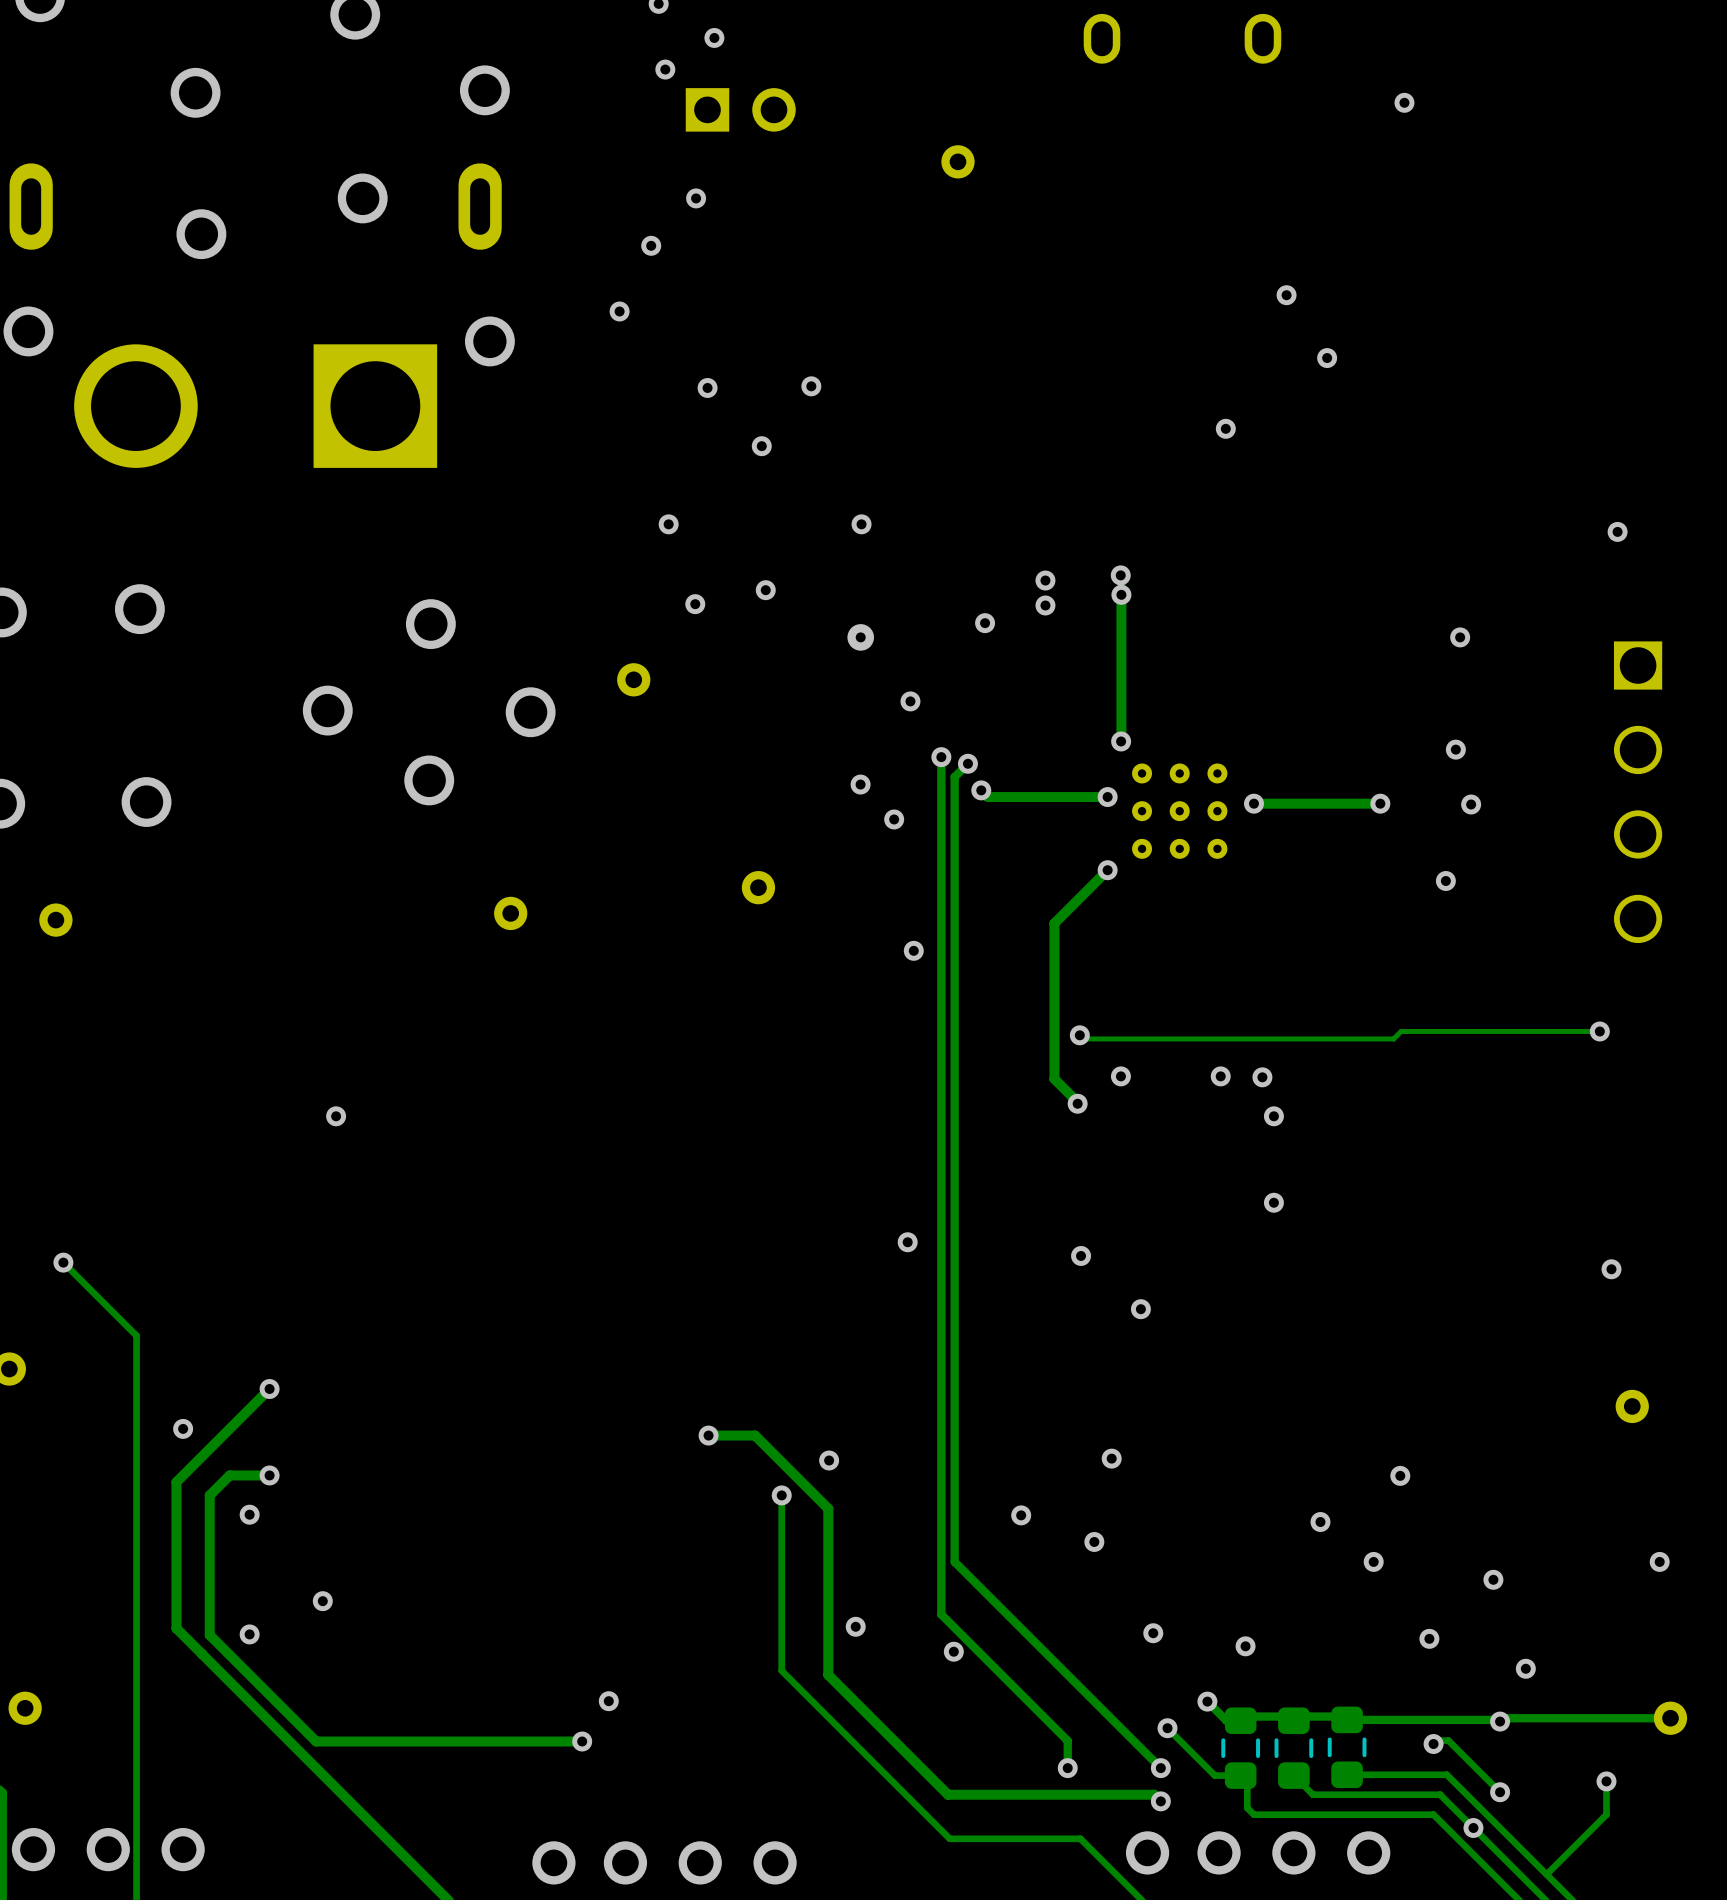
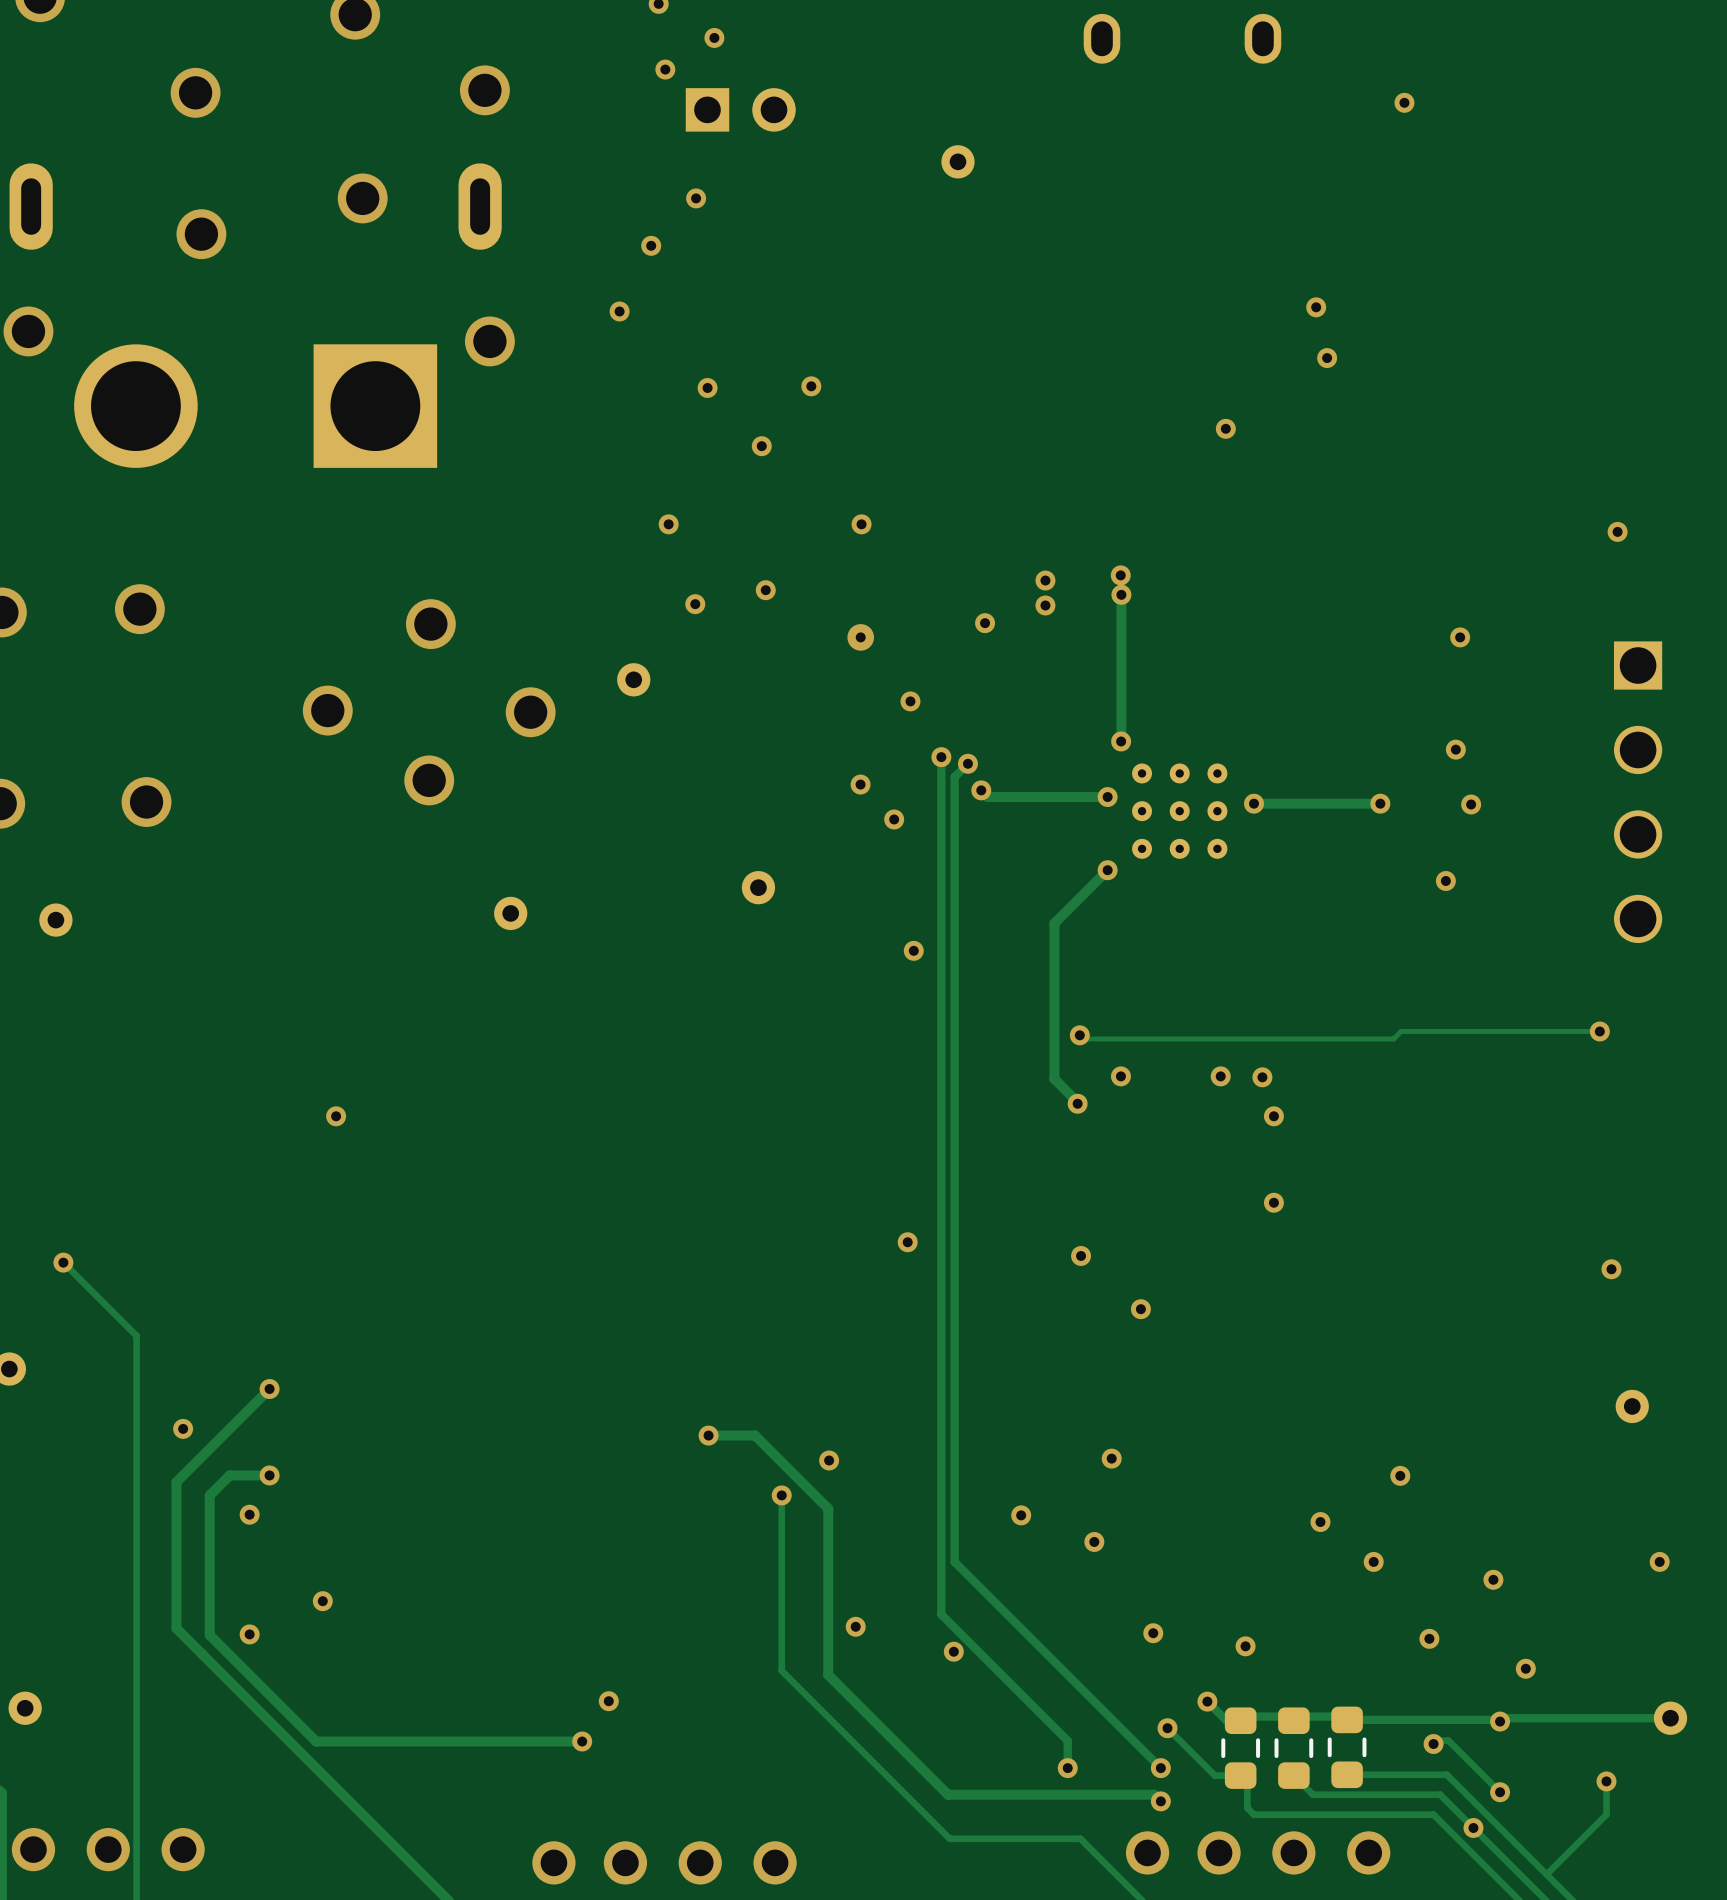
via position: (1286, 295) -> (1316, 307)

